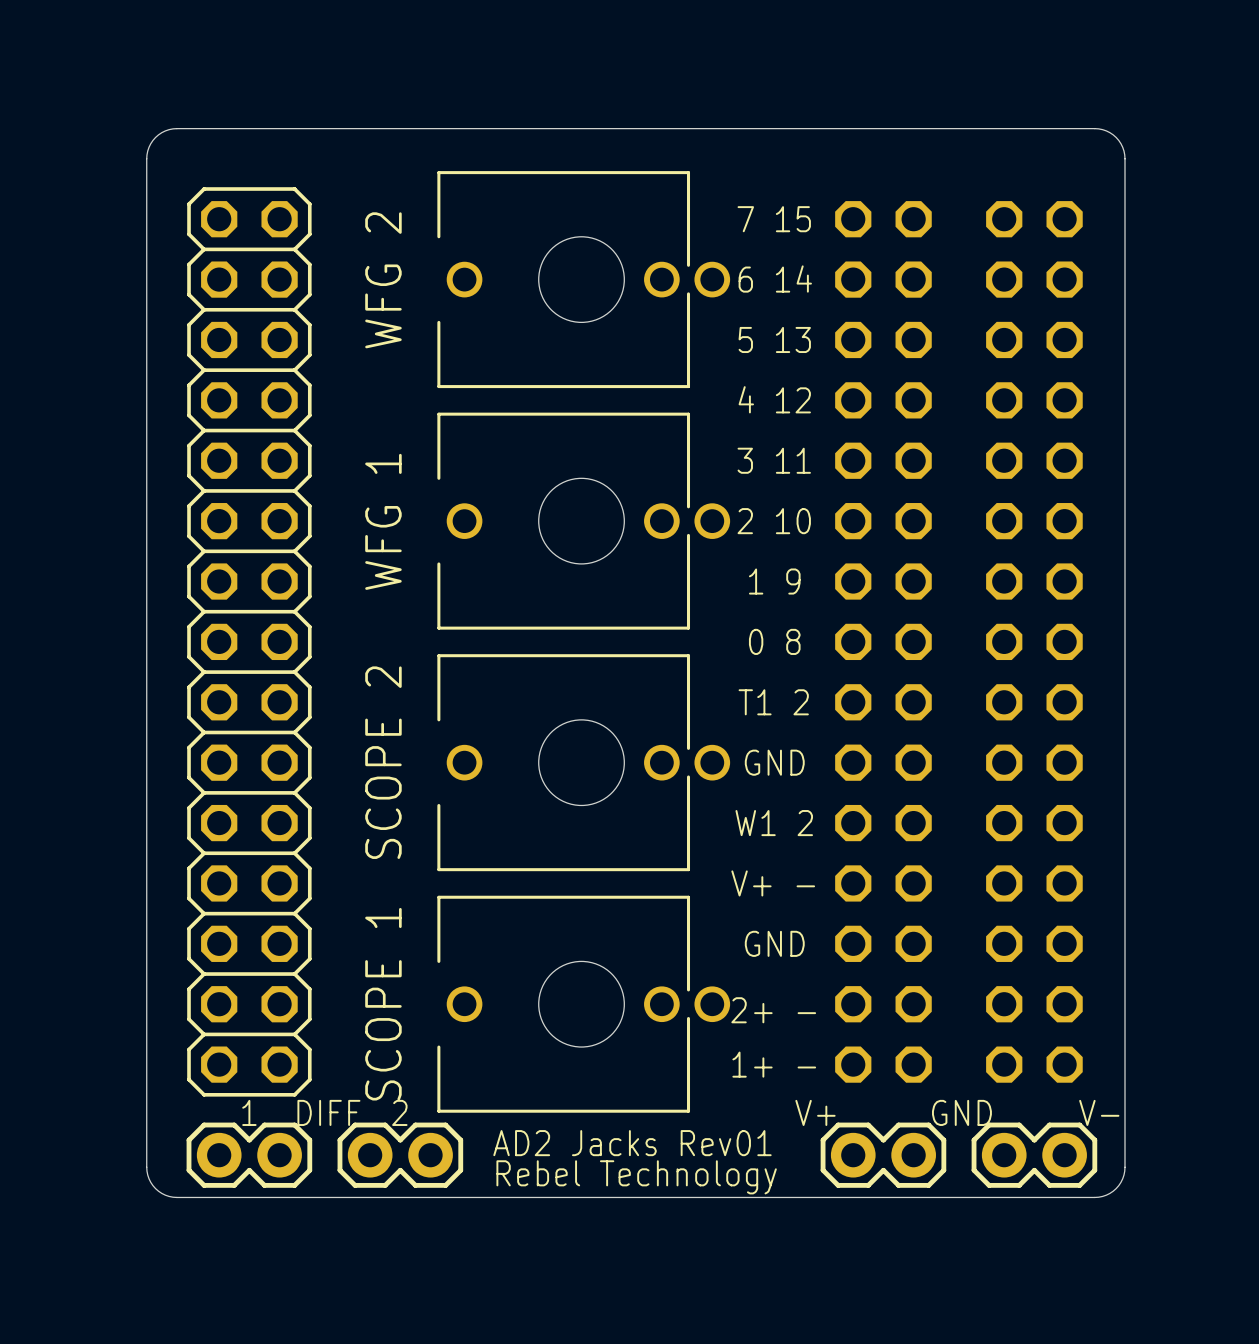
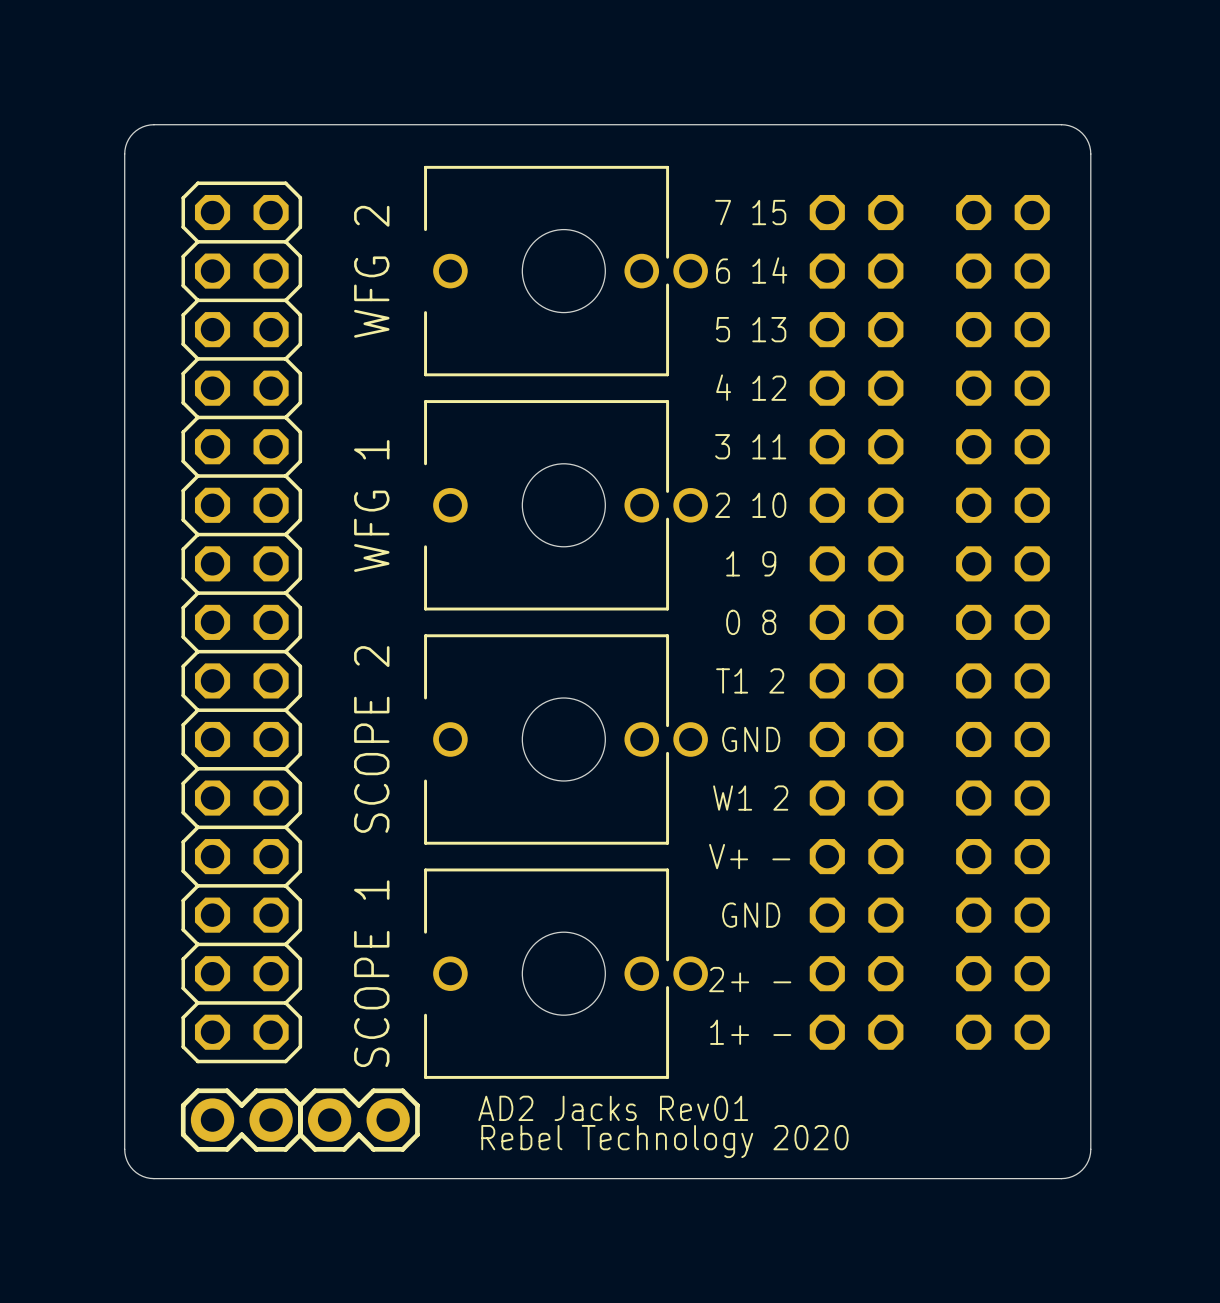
board edge: (176, 128) (165, 130) (155, 137) (149, 147) (146, 158) (146, 1167) (149, 1178) (155, 1188) (165, 1195) (176, 1197) (1094, 1197) (1106, 1195) (1116, 1188) (1122, 1178) (1125, 1167) -> (171, 124) (150, 124) (139, 128) (128, 139) (124, 153) (124, 1149) (126, 1160) (133, 1170) (142, 1176) (153, 1178) (1061, 1178) (1076, 1174) (1086, 1163) (1090, 1153) (1090, 1131)
text: 1 (249, 1112) -> none
text: DIFF (328, 1112) -> none
text: 2 (399, 1112) -> none
text: V+ (815, 1112) -> none
text: GND (961, 1112) -> none
text: V- (1099, 1112) -> none
part position: (400, 1155) -> (358, 1120)
part: (883, 1155) -> none
part: (1034, 1155) -> none
text: Rebel Technology (636, 1177) -> Rebel Technology 2020 (664, 1141)

